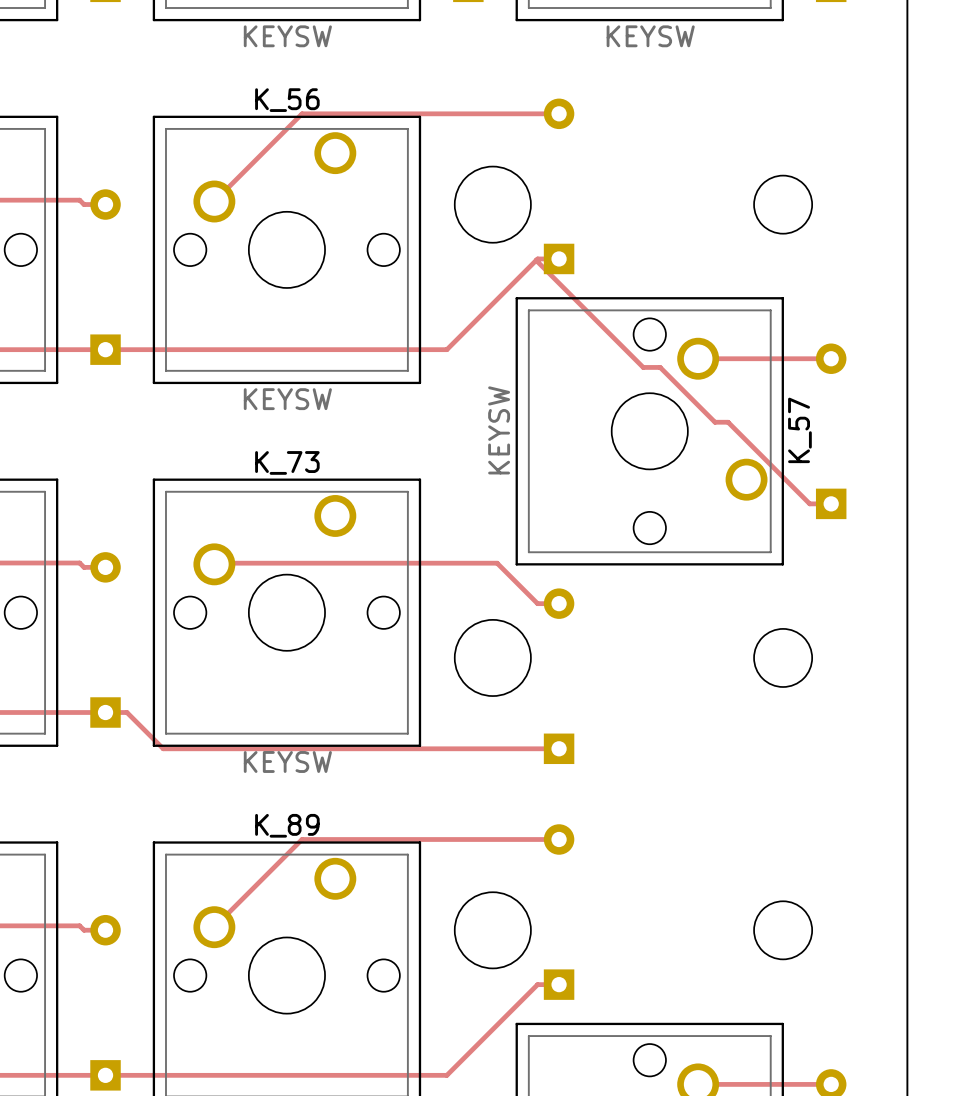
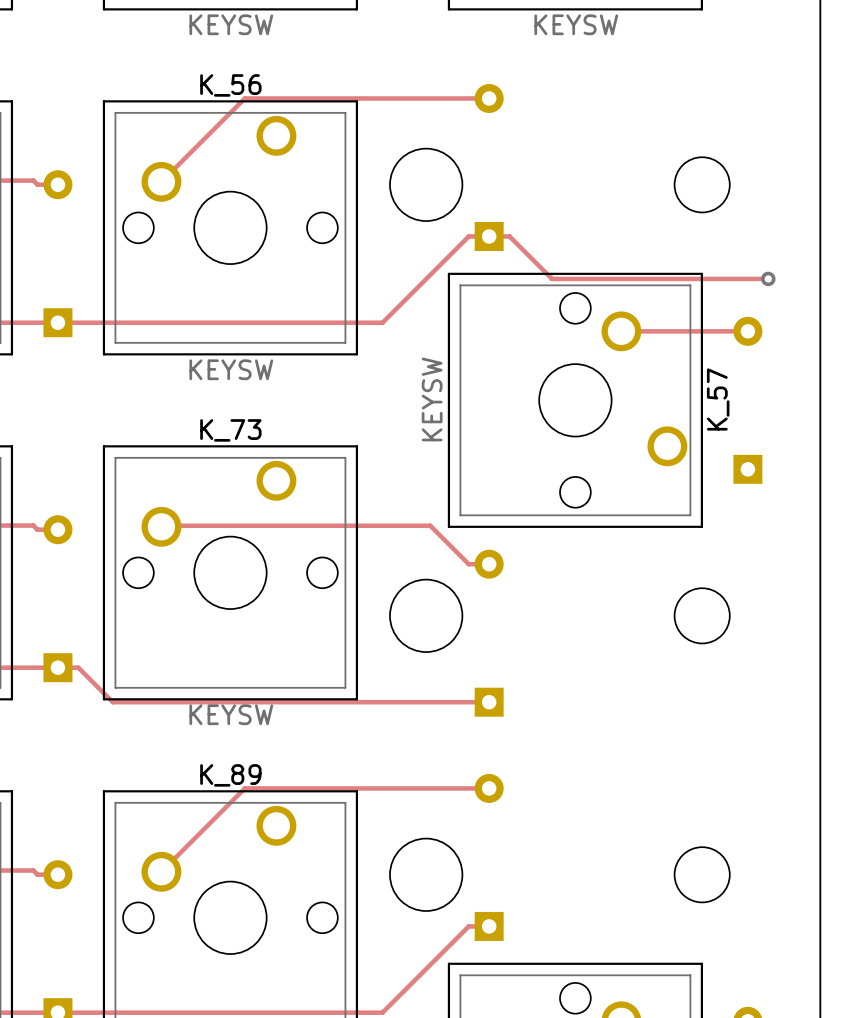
track: none -> (489, 236) (509, 236) (552, 278) (768, 278)
track: (536, 260) (643, 367) (660, 367) (715, 422) (728, 422) (809, 503) (831, 503) -> none
via: none -> (768, 278)

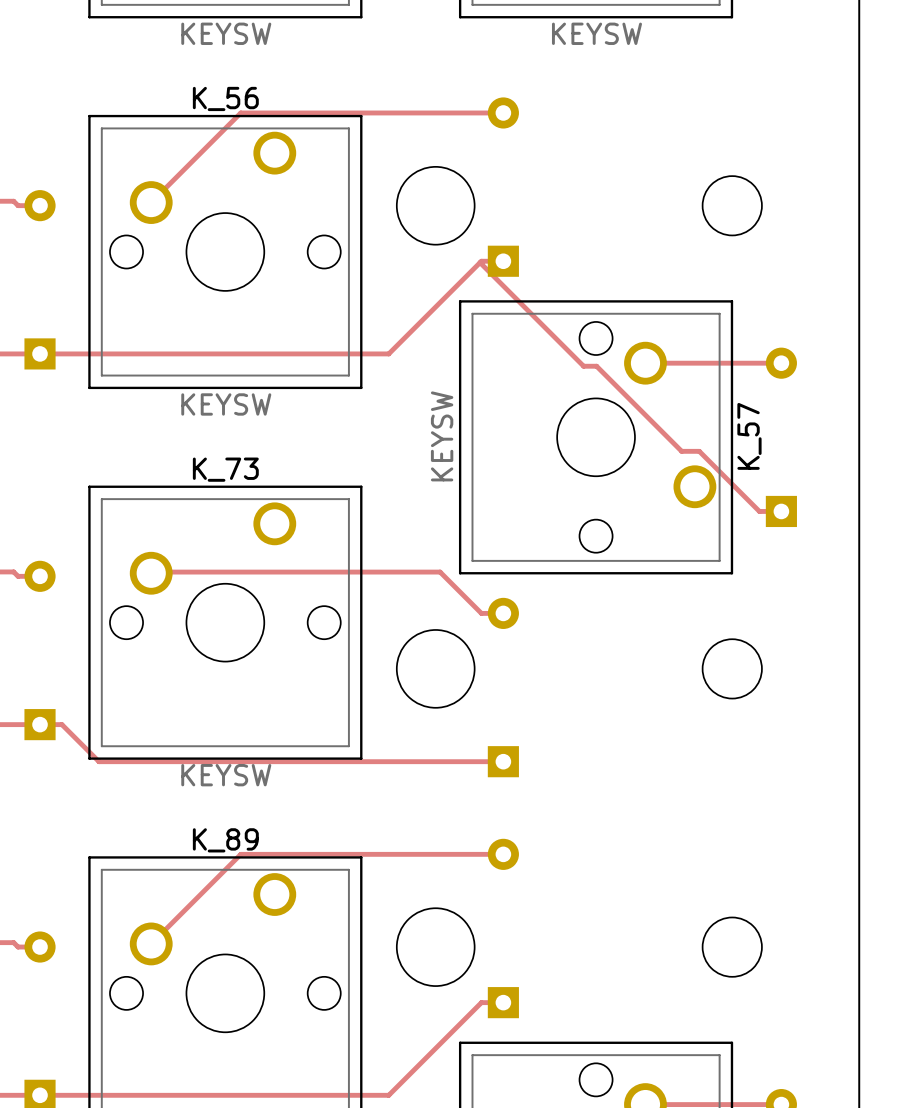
track: (489, 236) (509, 236) (552, 278) (768, 278) -> none
track: none -> (480, 262) (583, 366) (596, 366) (681, 451) (699, 451) (759, 511) (781, 511)
via: (768, 278) -> none

